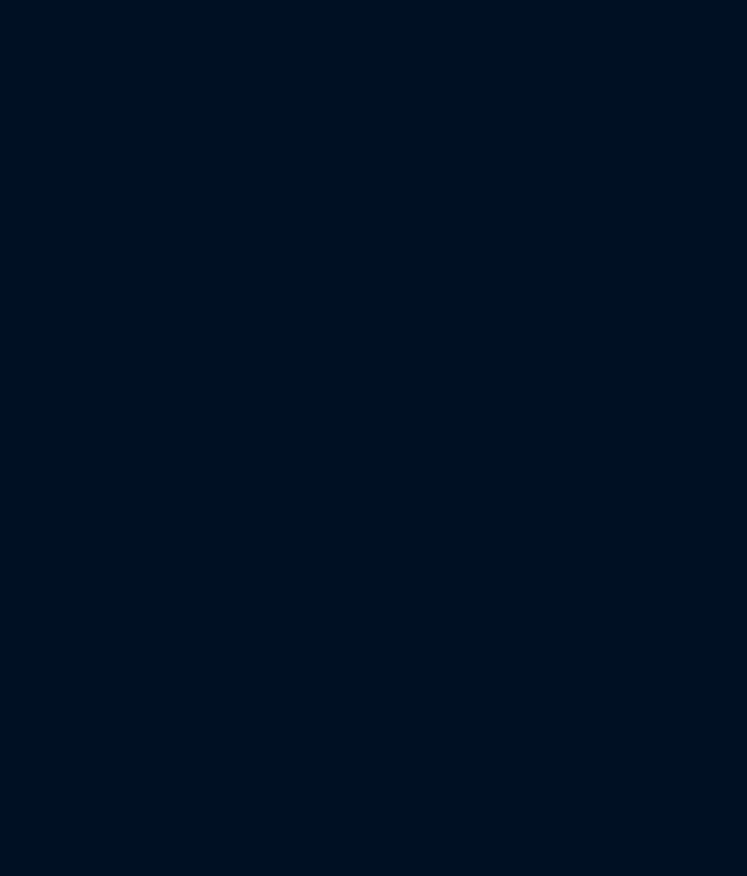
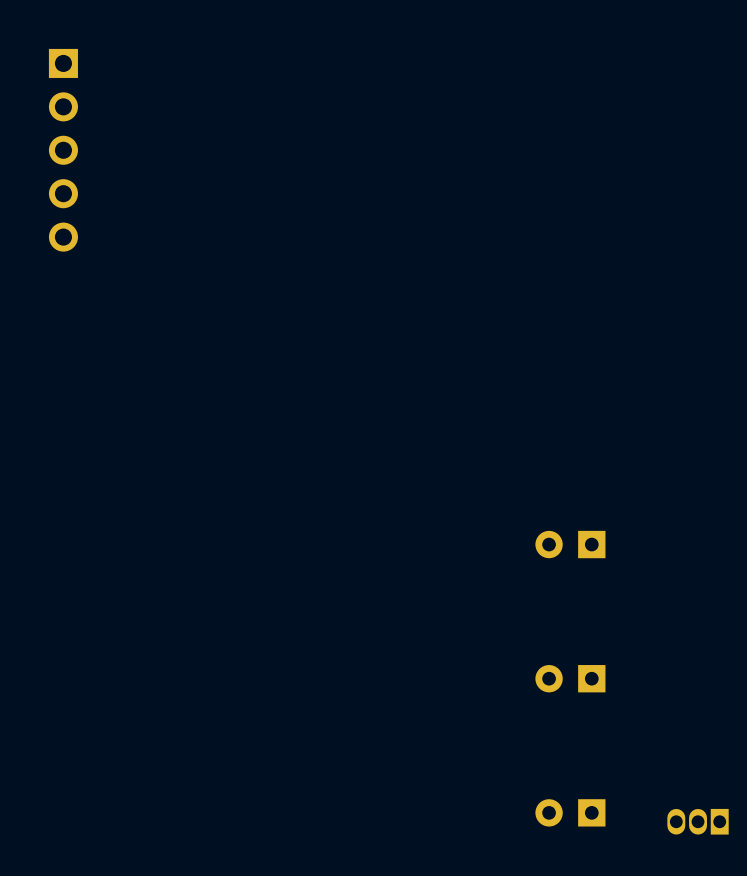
part: none -> (63, 150)
part: none -> (570, 544)
part: none -> (570, 678)
part: none -> (570, 812)
part: none -> (698, 821)

